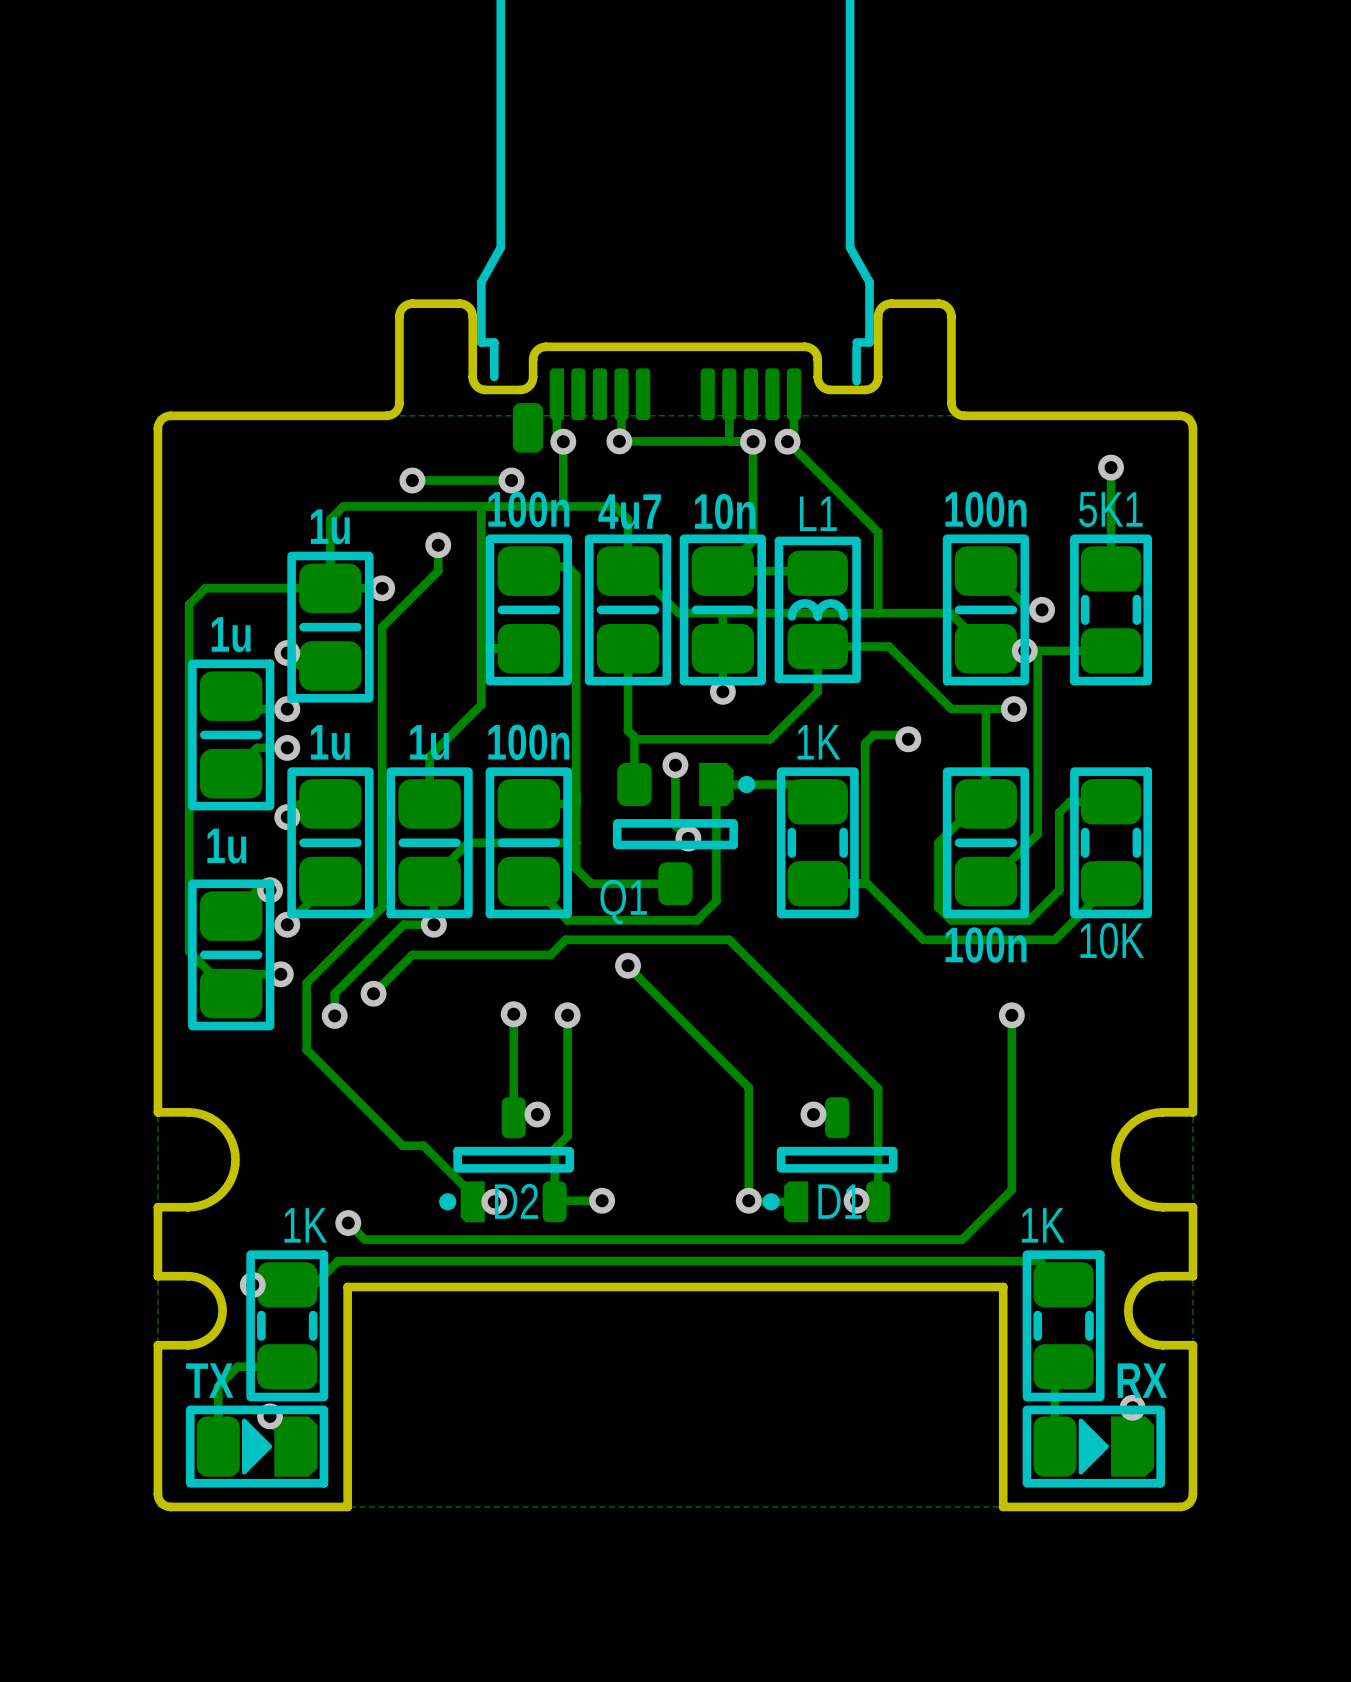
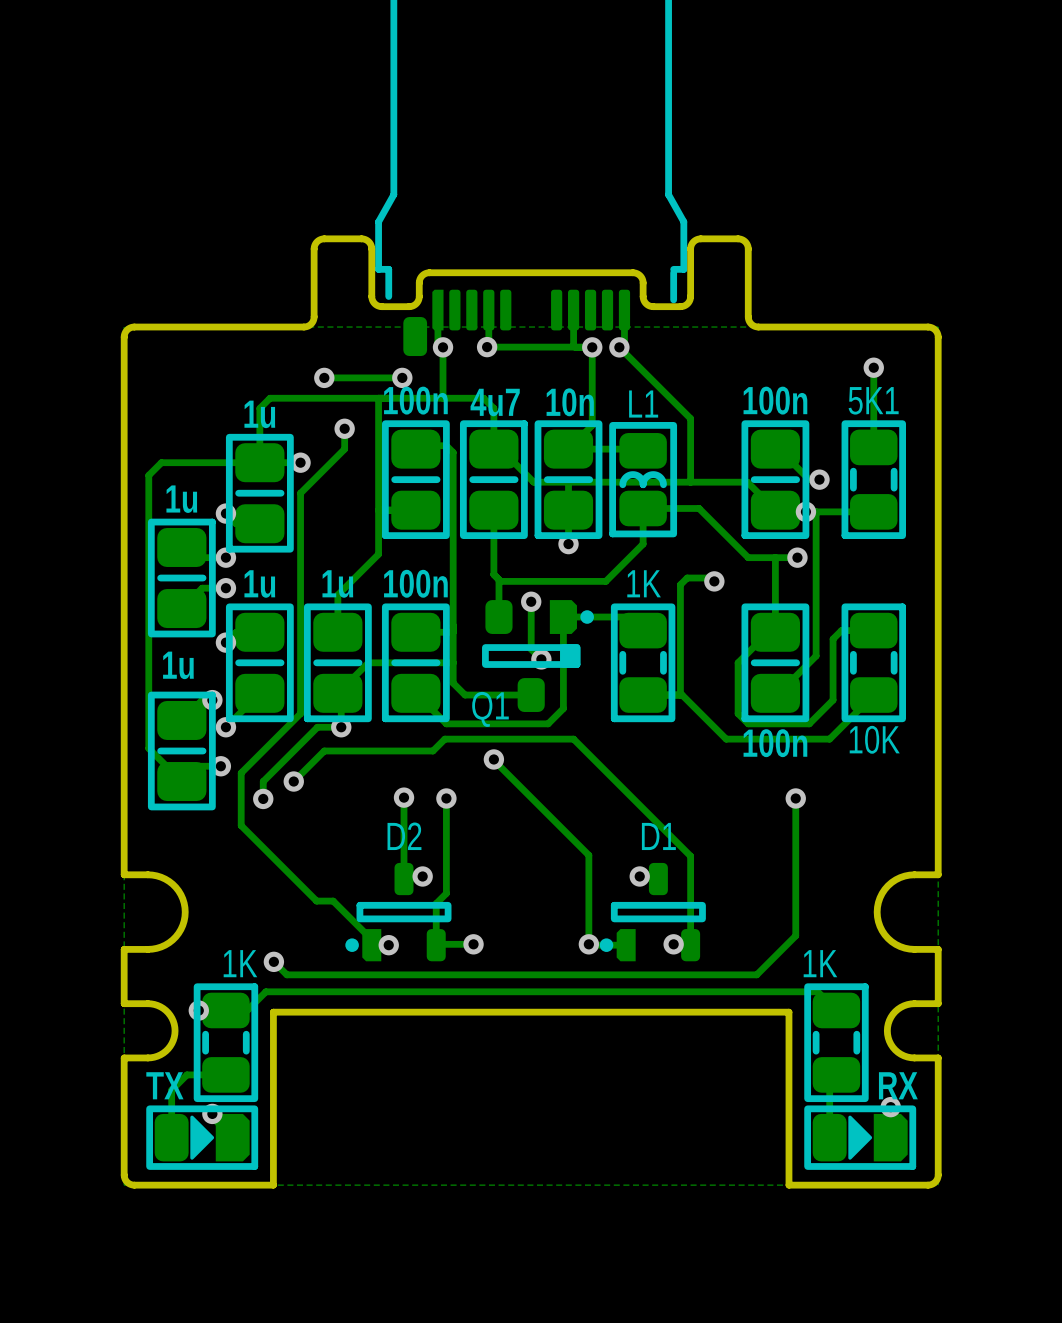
Q1 footprint: [612, 763, 756, 906] -> [482, 600, 594, 712]
D2 name position: D2 (516, 1201) -> D2 (404, 836)
D1 name position: D1 (839, 1201) -> D1 (658, 836)

